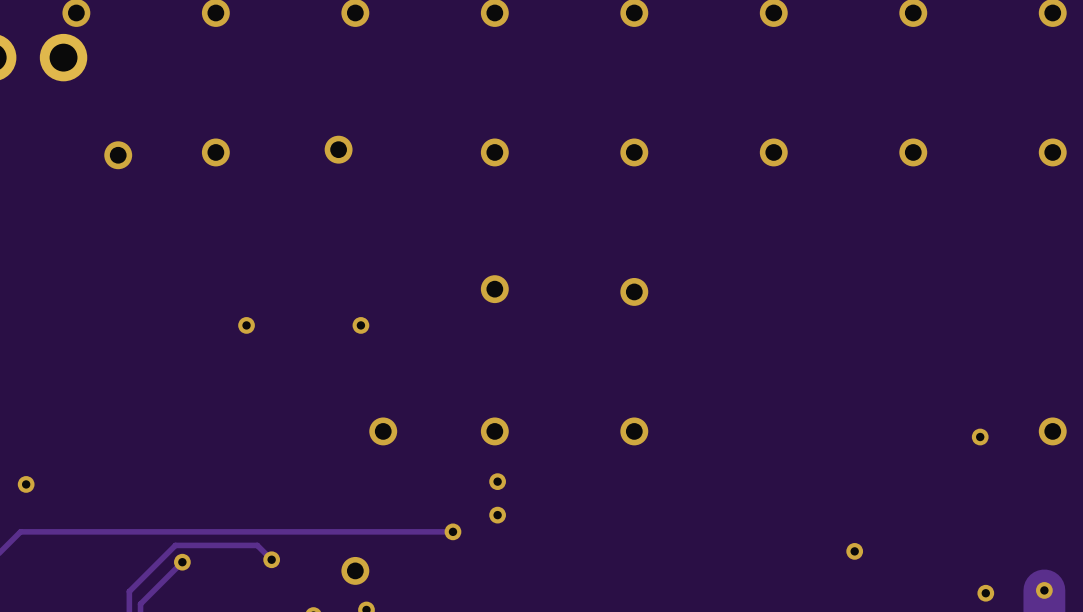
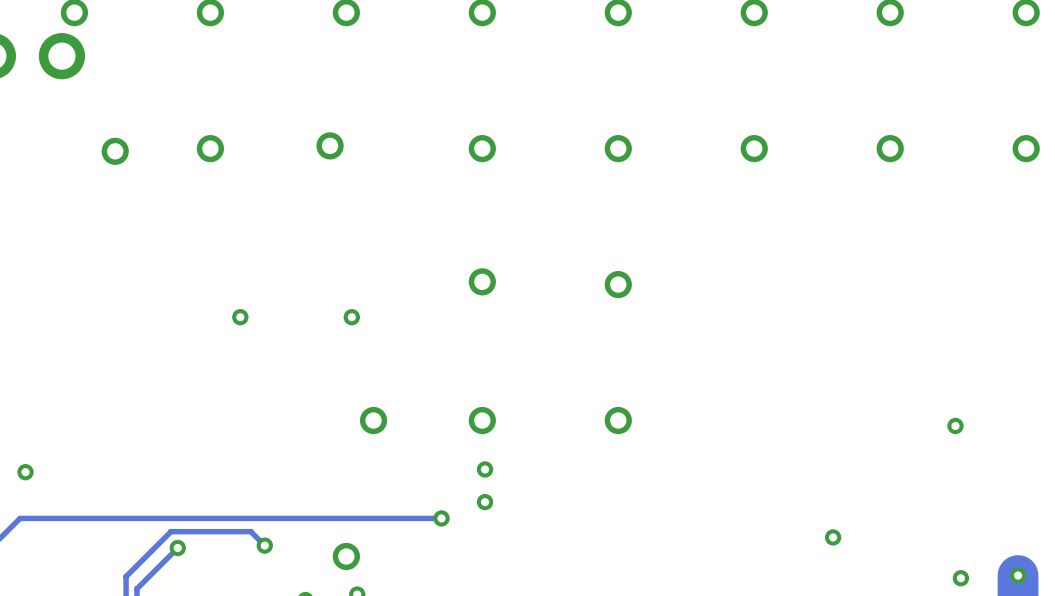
via: (1052, 431) -> none

